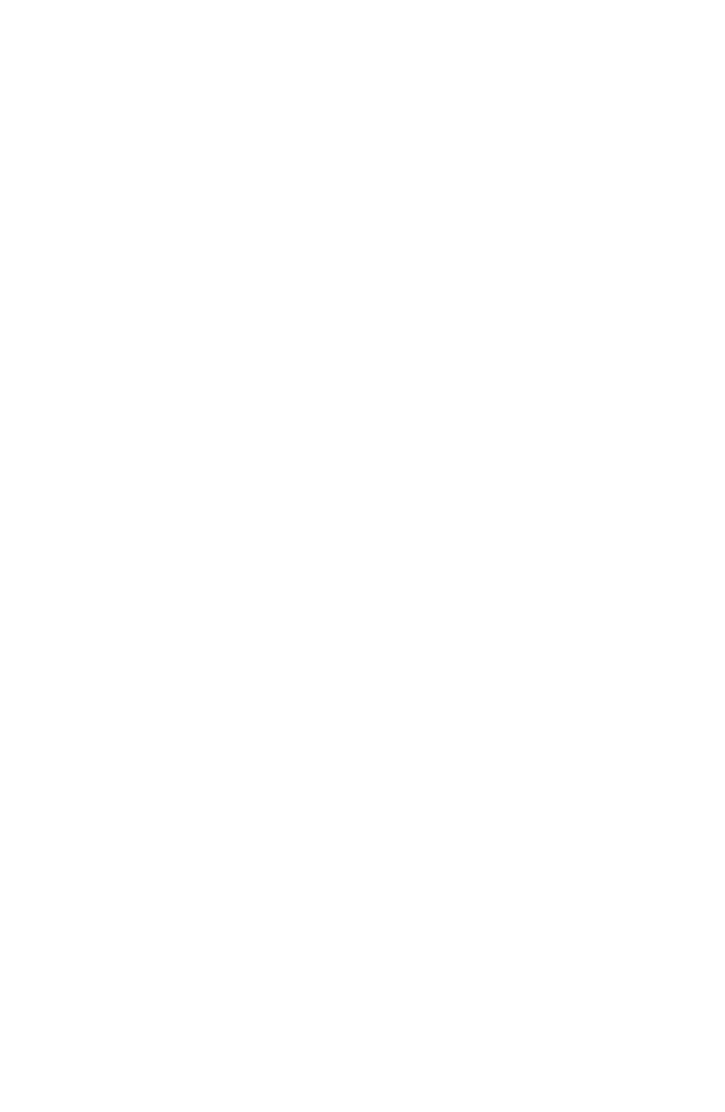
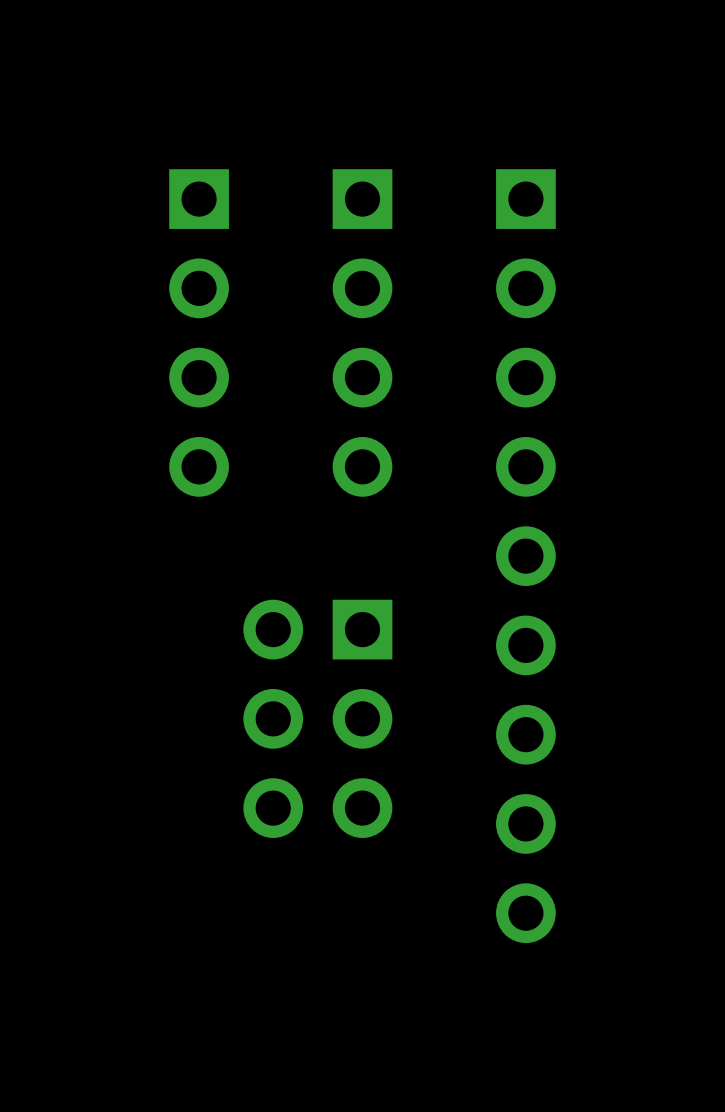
part: none -> (199, 332)
part: none -> (362, 332)
part: none -> (525, 556)
part: none -> (317, 718)

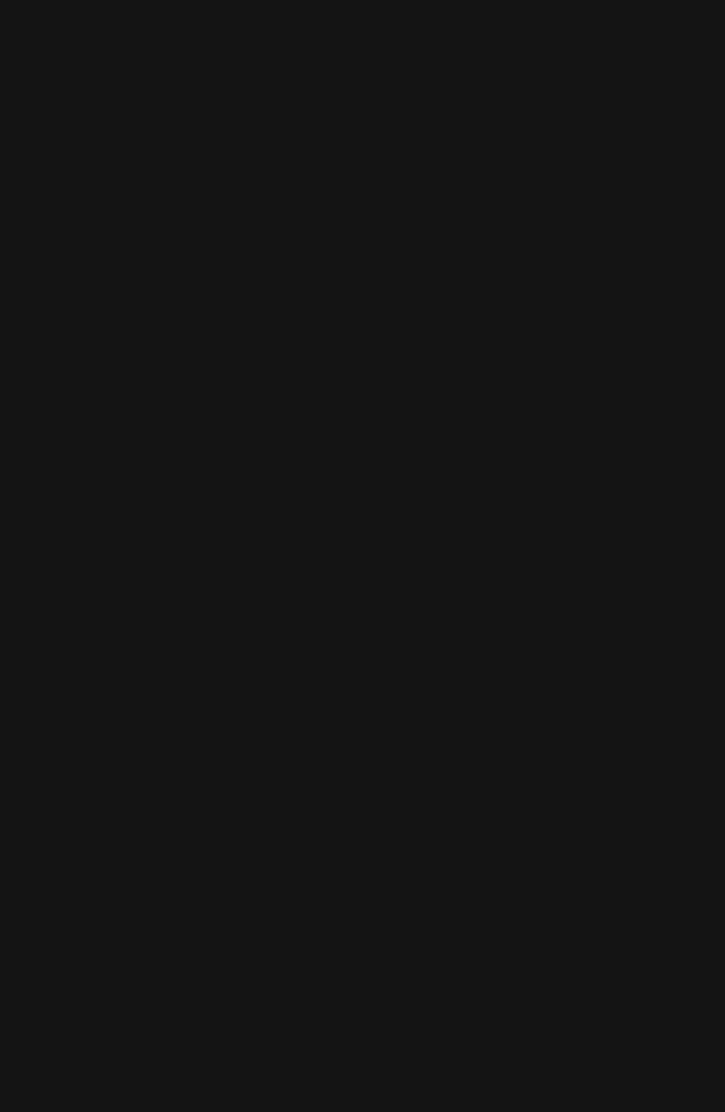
part: (199, 332) -> none
part: (362, 332) -> none
part: (525, 556) -> none
part: (317, 718) -> none

